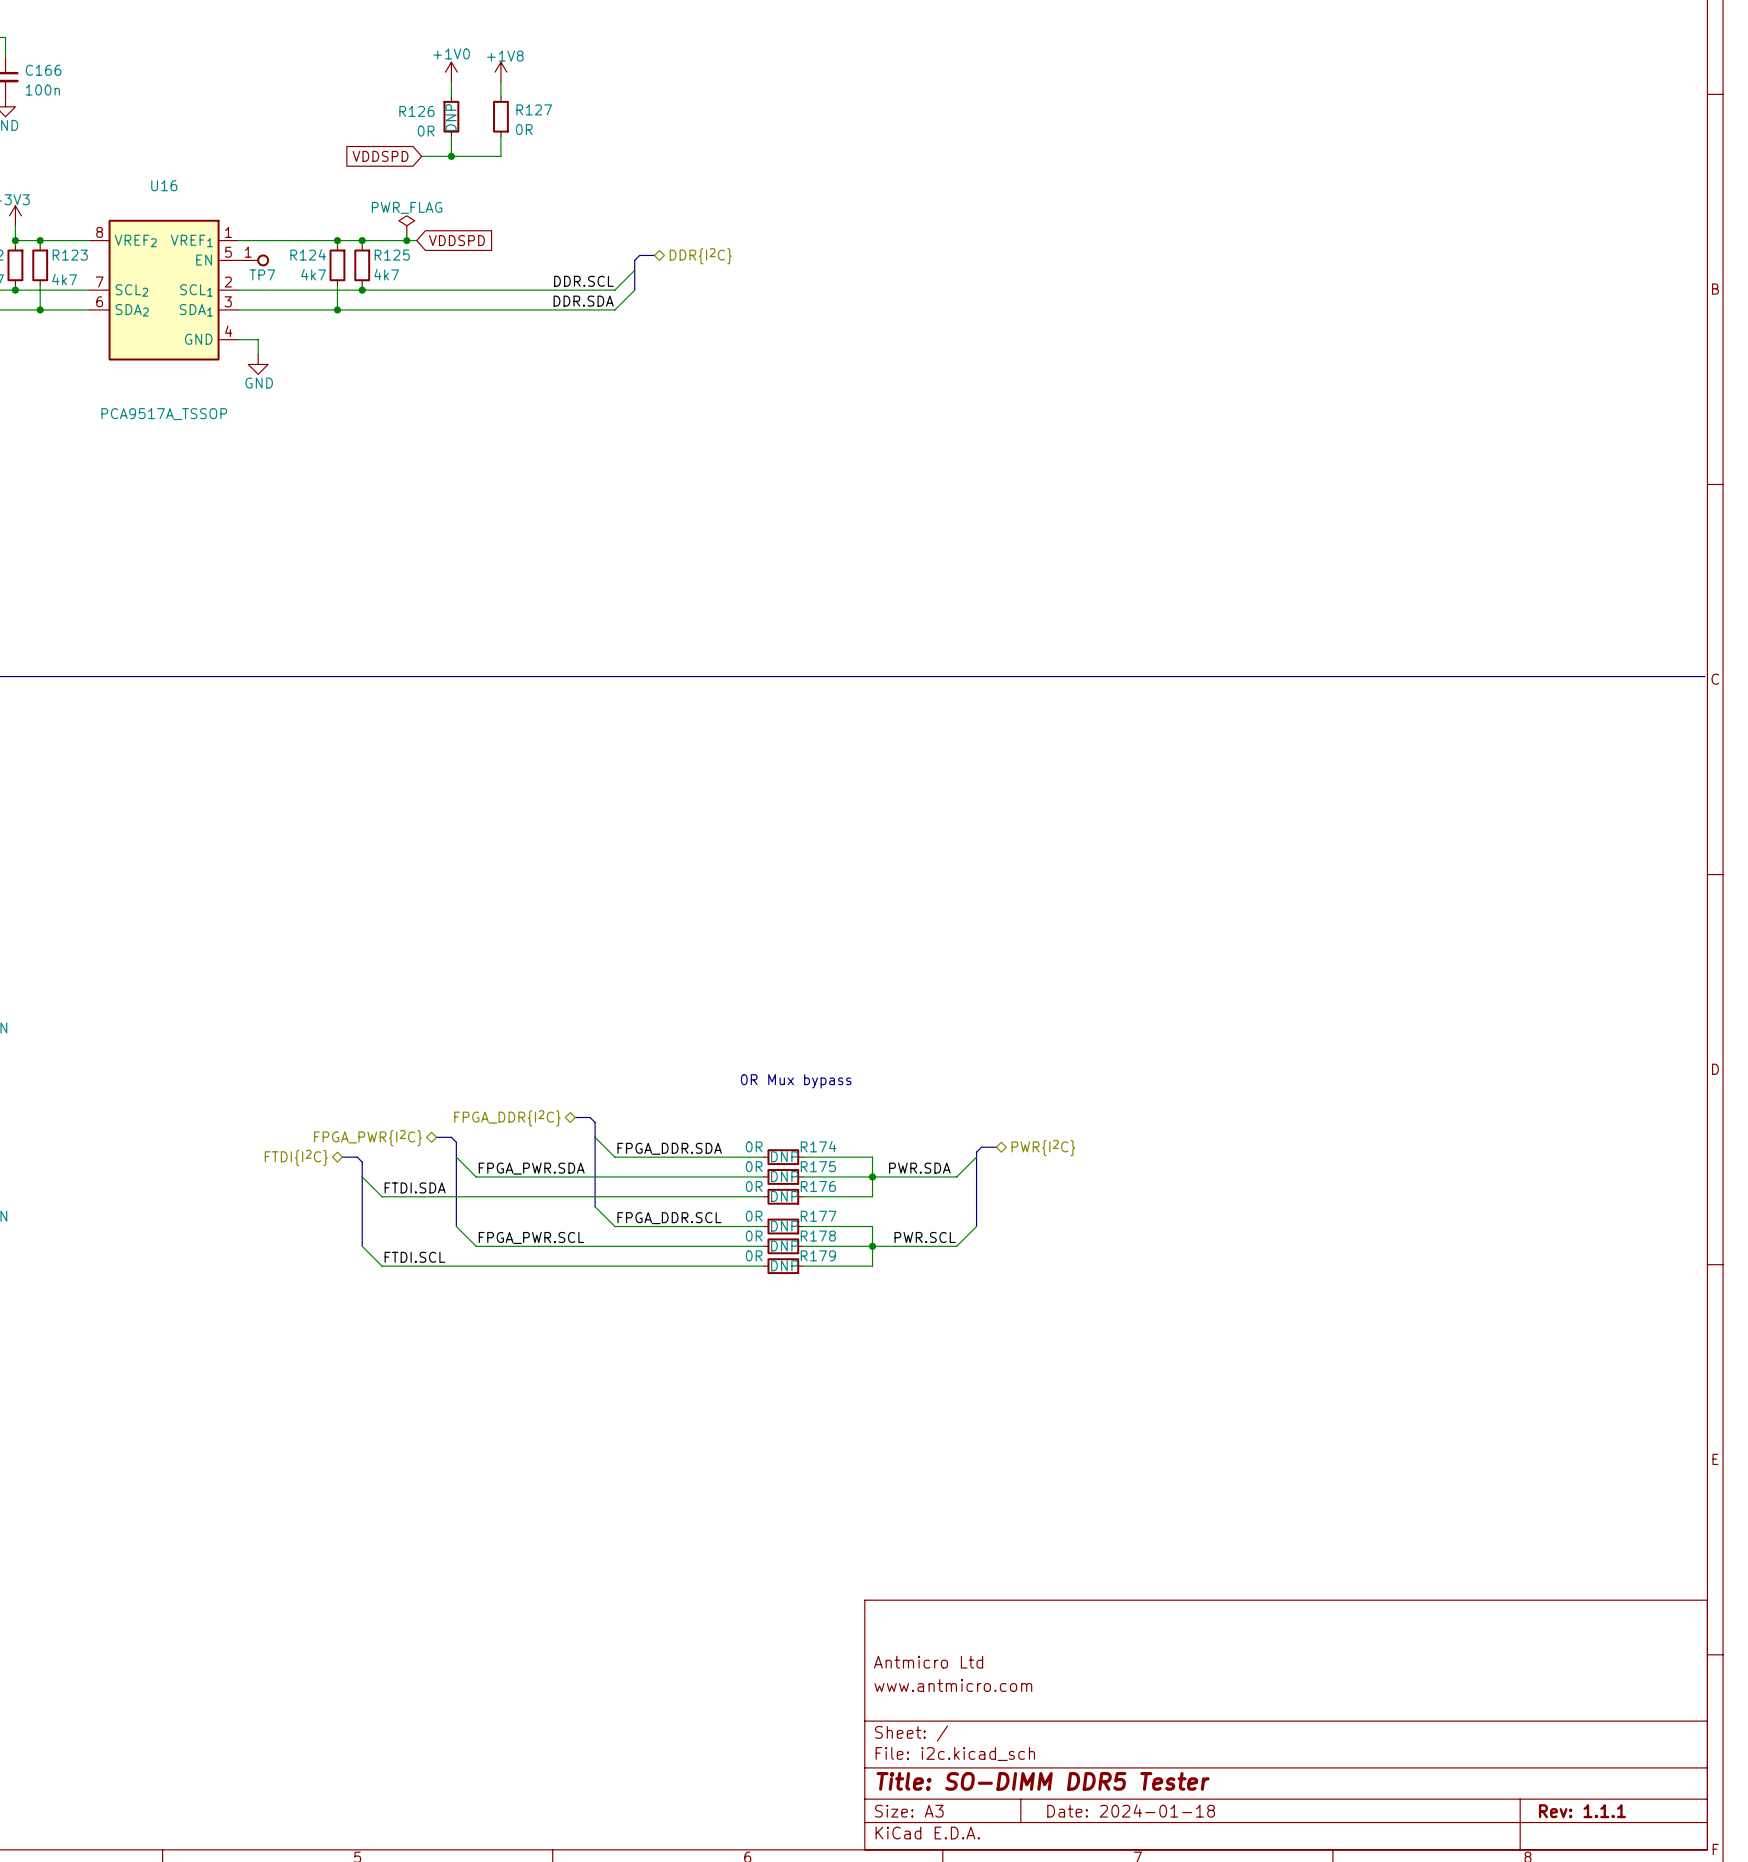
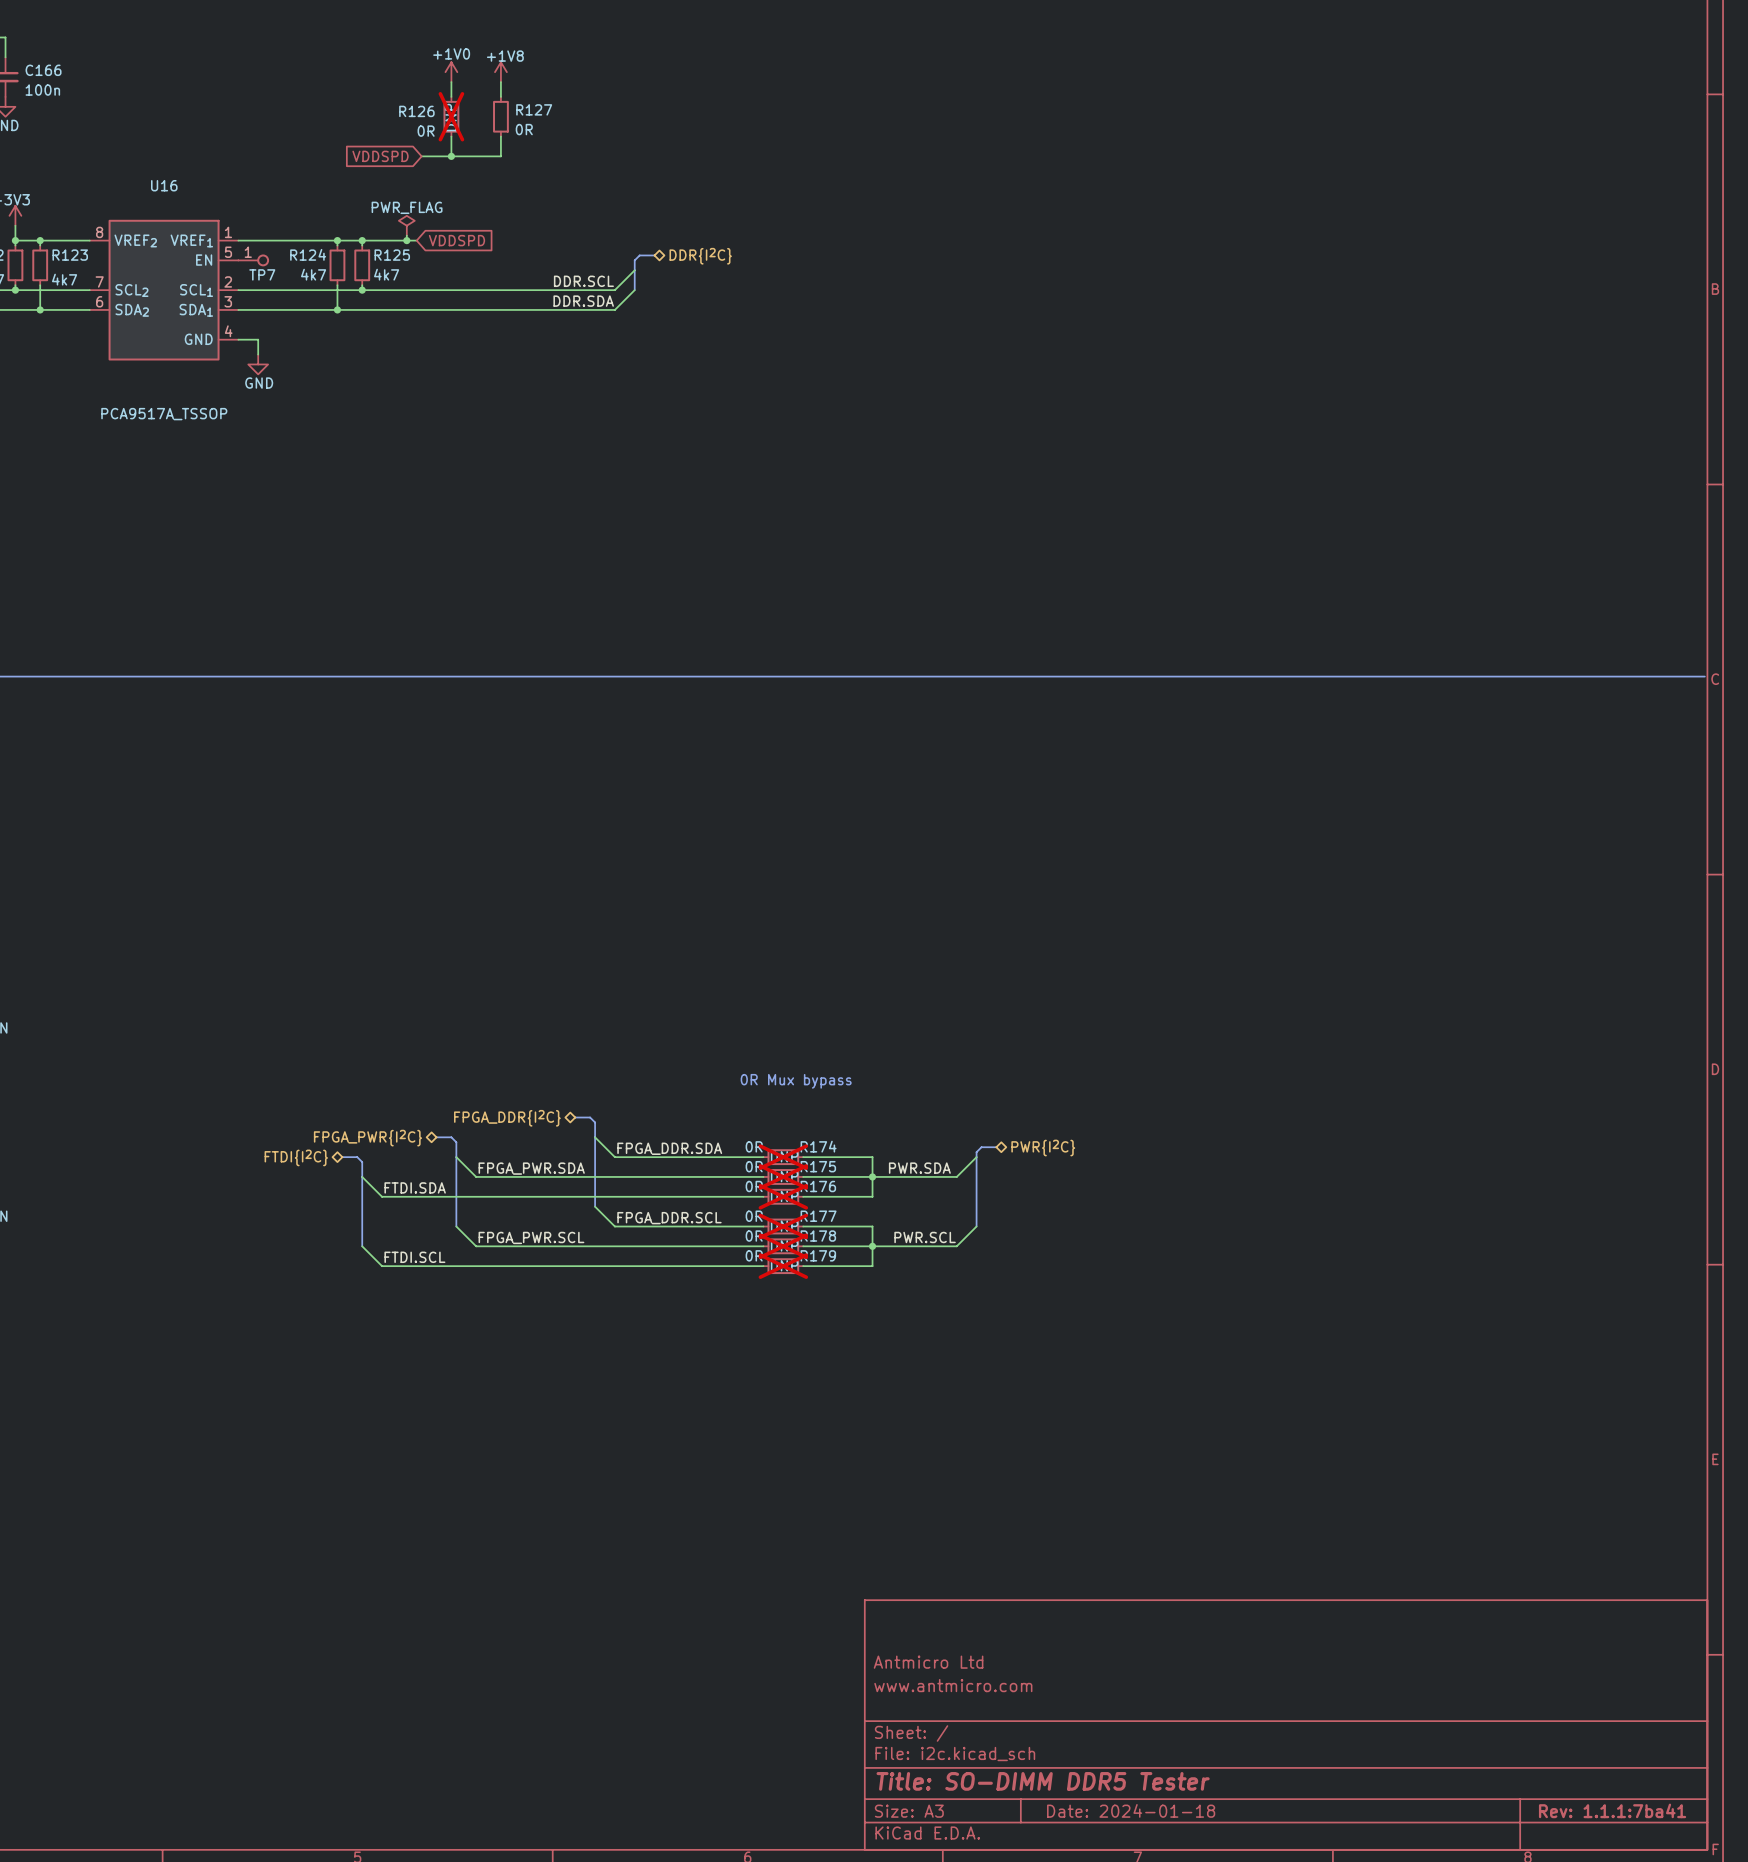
R126 do-not-place cross: none -> (451, 116)
R174 do-not-place cross: none -> (783, 1157)
R175 do-not-place cross: none -> (783, 1176)
R176 do-not-place cross: none -> (783, 1196)
R177 do-not-place cross: none -> (783, 1226)
R178 do-not-place cross: none -> (783, 1246)
R179 do-not-place cross: none -> (783, 1266)
title block: Rev: 1.1.1 (1582, 1811) -> Rev: 1.1.1:7ba41 (1612, 1810)

